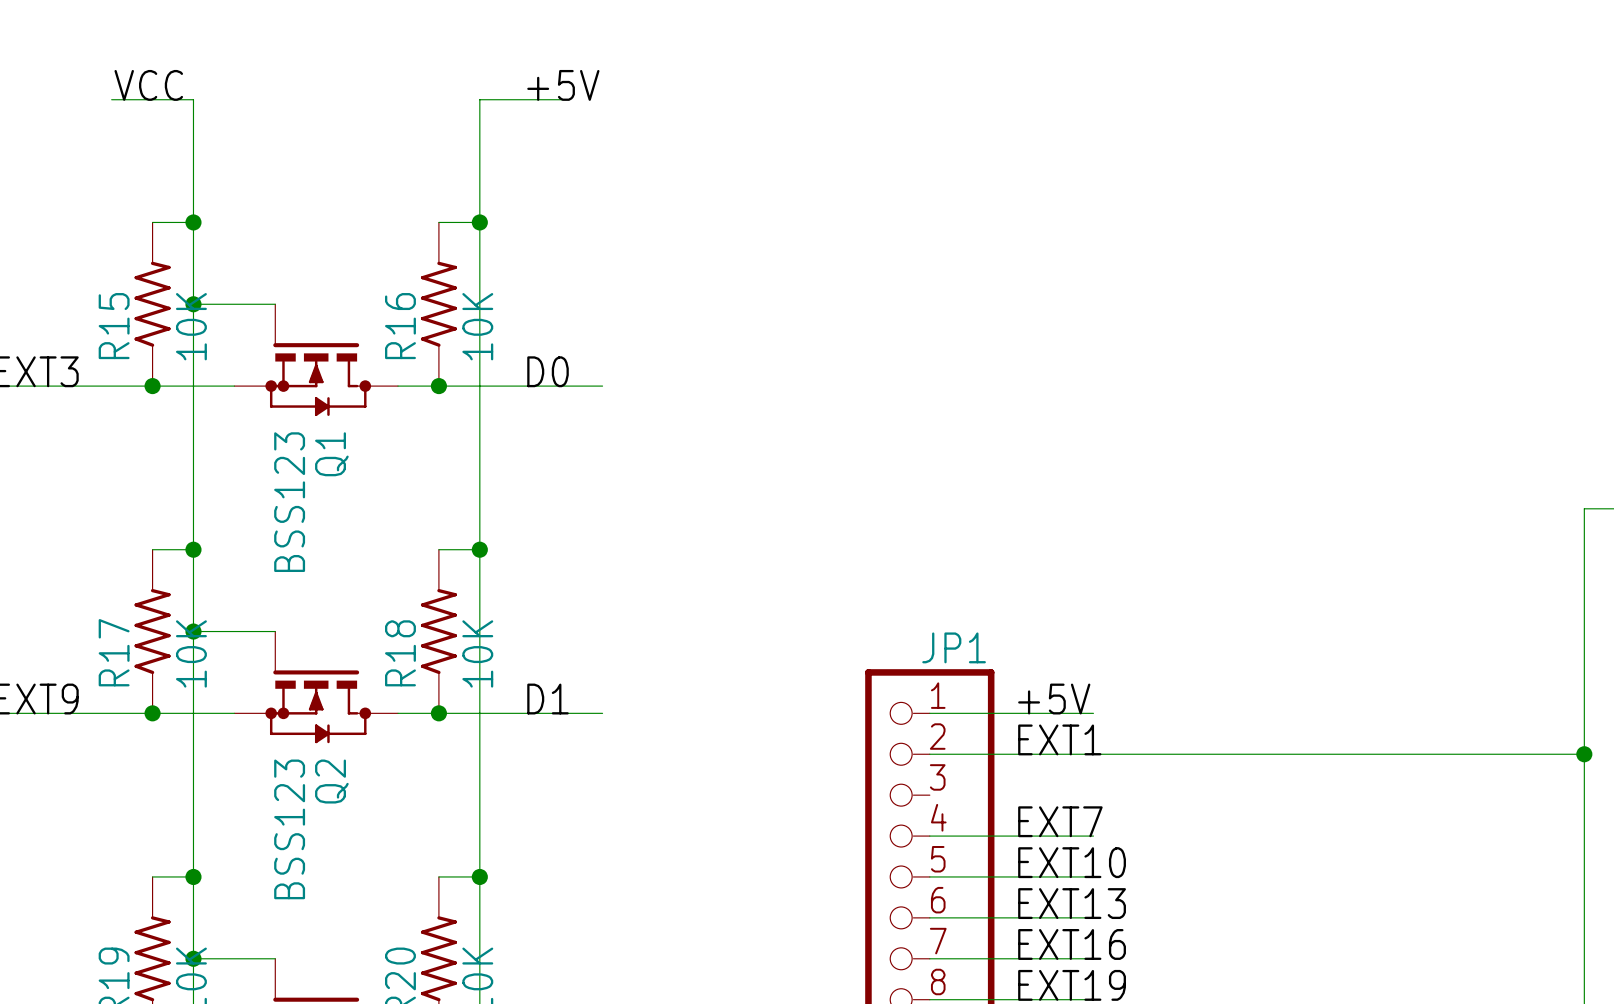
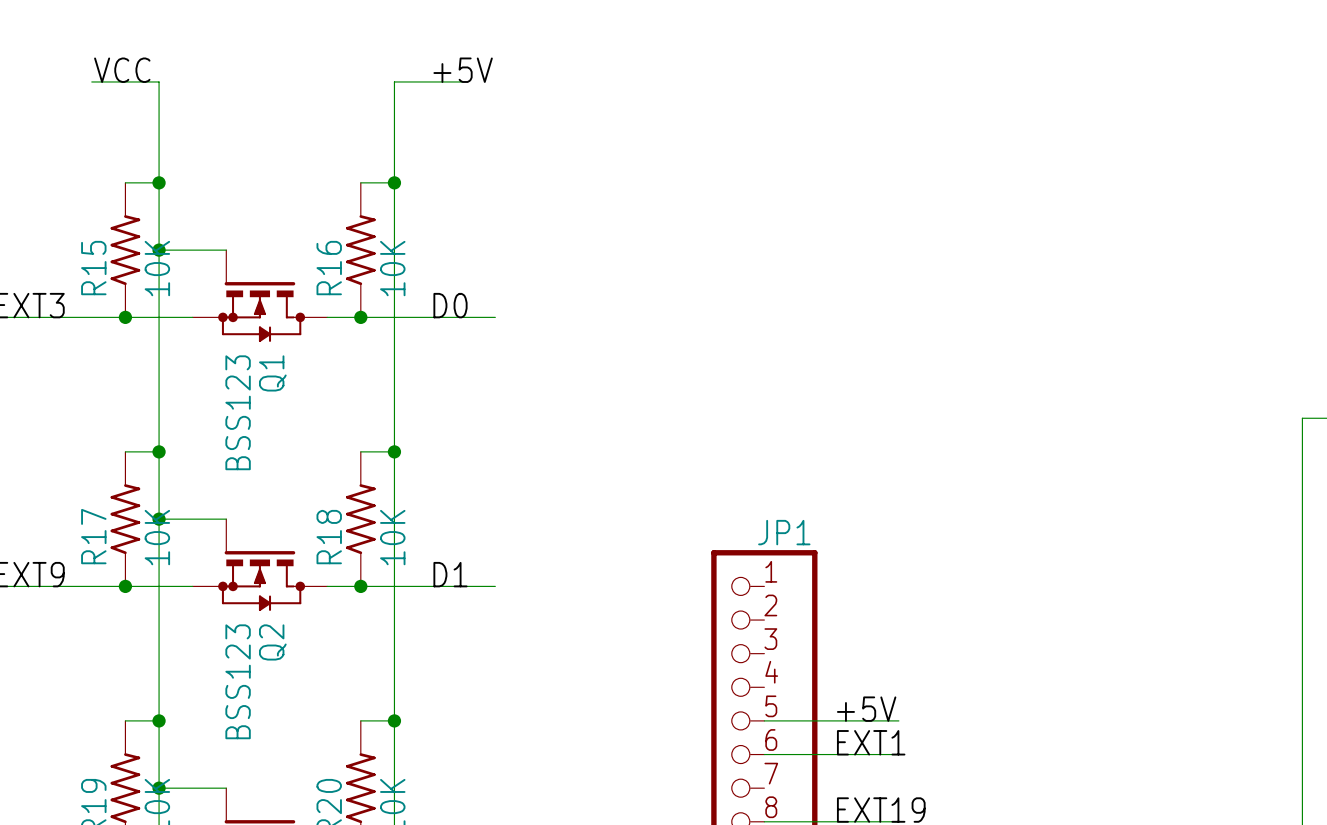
label: +5V (1054, 699) -> none
wire: (929, 713) (1093, 713) -> none
label: EXT1 (1059, 739) -> none
wire: (929, 754) (1584, 754) -> none
junction: (1584, 754) -> none
label: EXT7 (1060, 821) -> none
wire: (929, 836) (1093, 836) -> none
label: EXT10 (1072, 862) -> +5V (866, 709)
label: EXT13 (1072, 903) -> EXT1 (871, 742)
label: EXT16 (1072, 944) -> none
wire: (929, 958) (1093, 958) -> none

